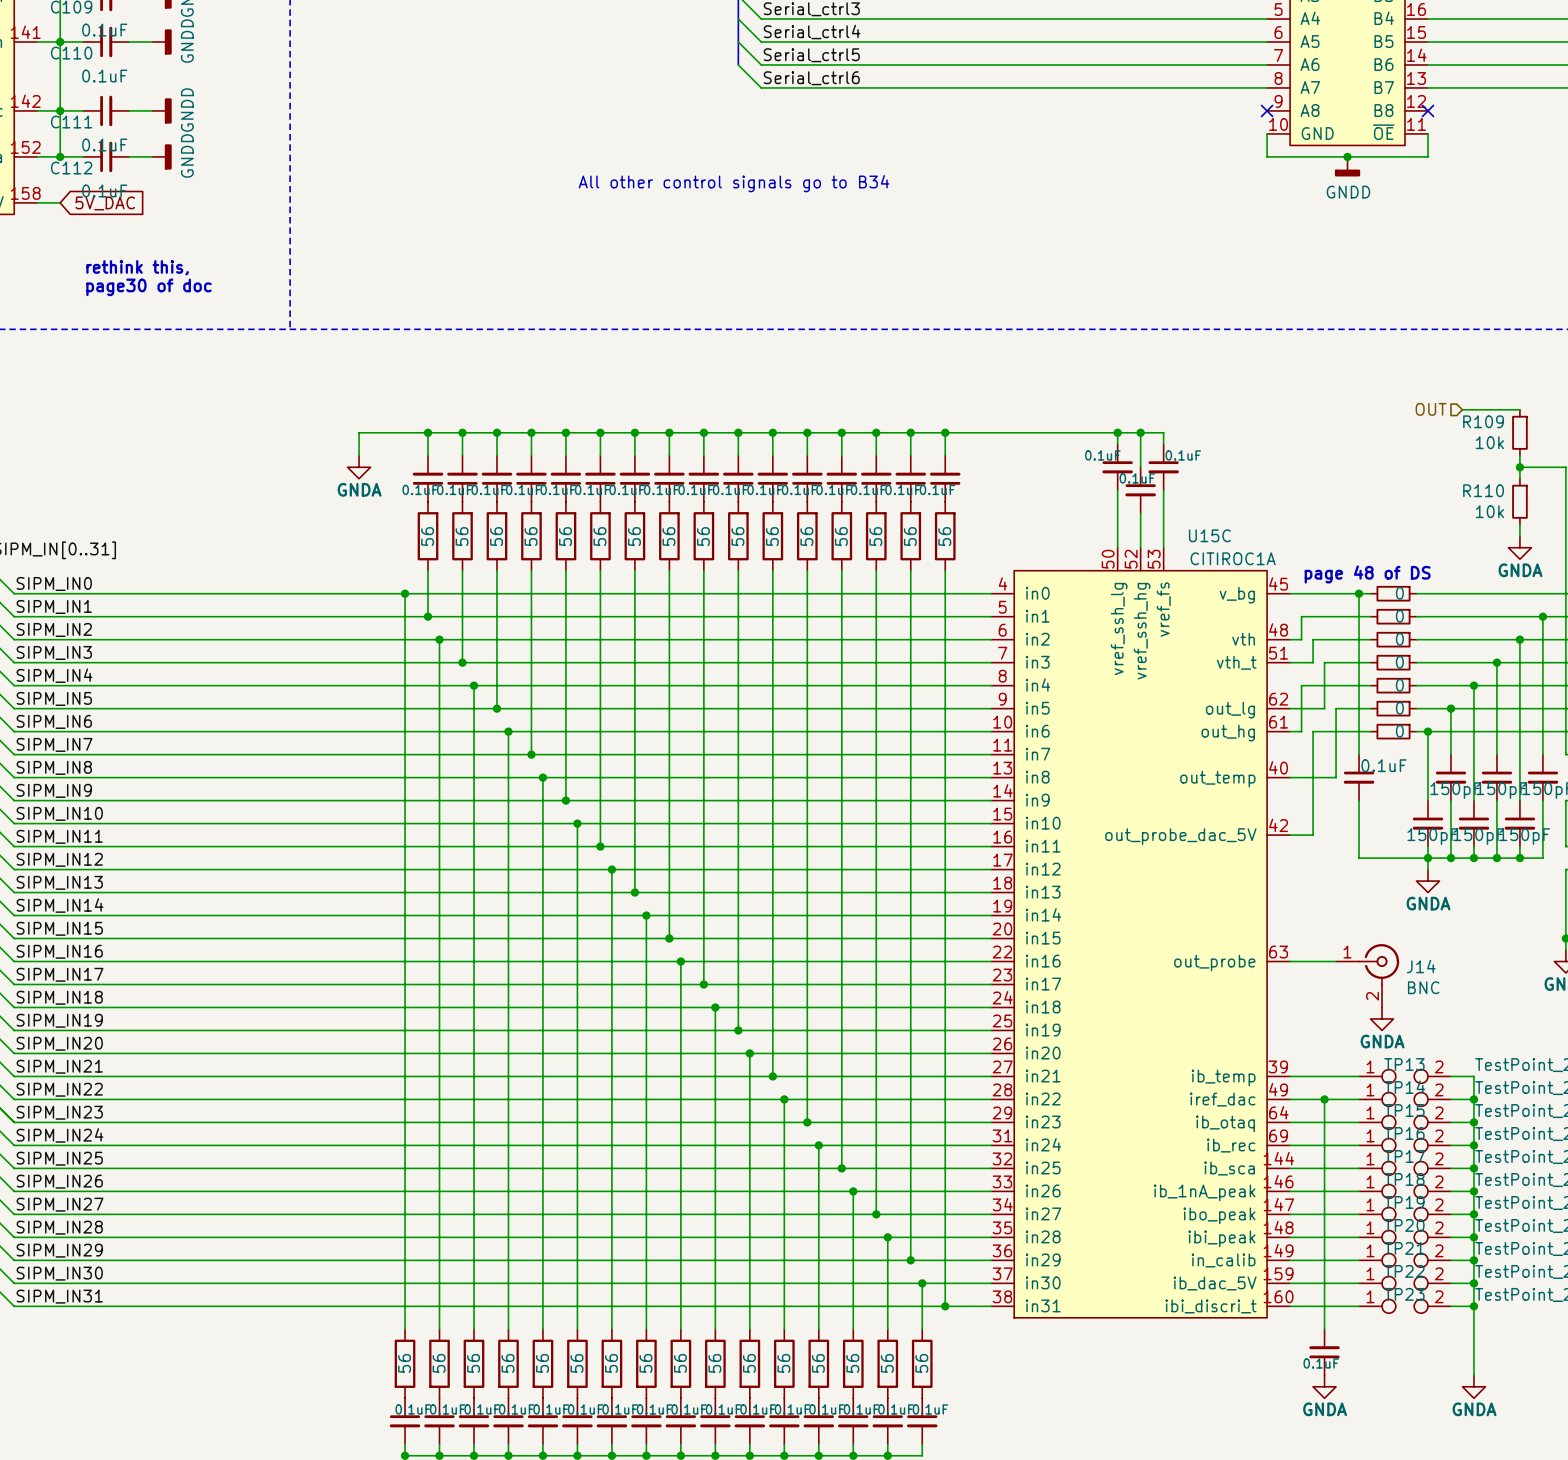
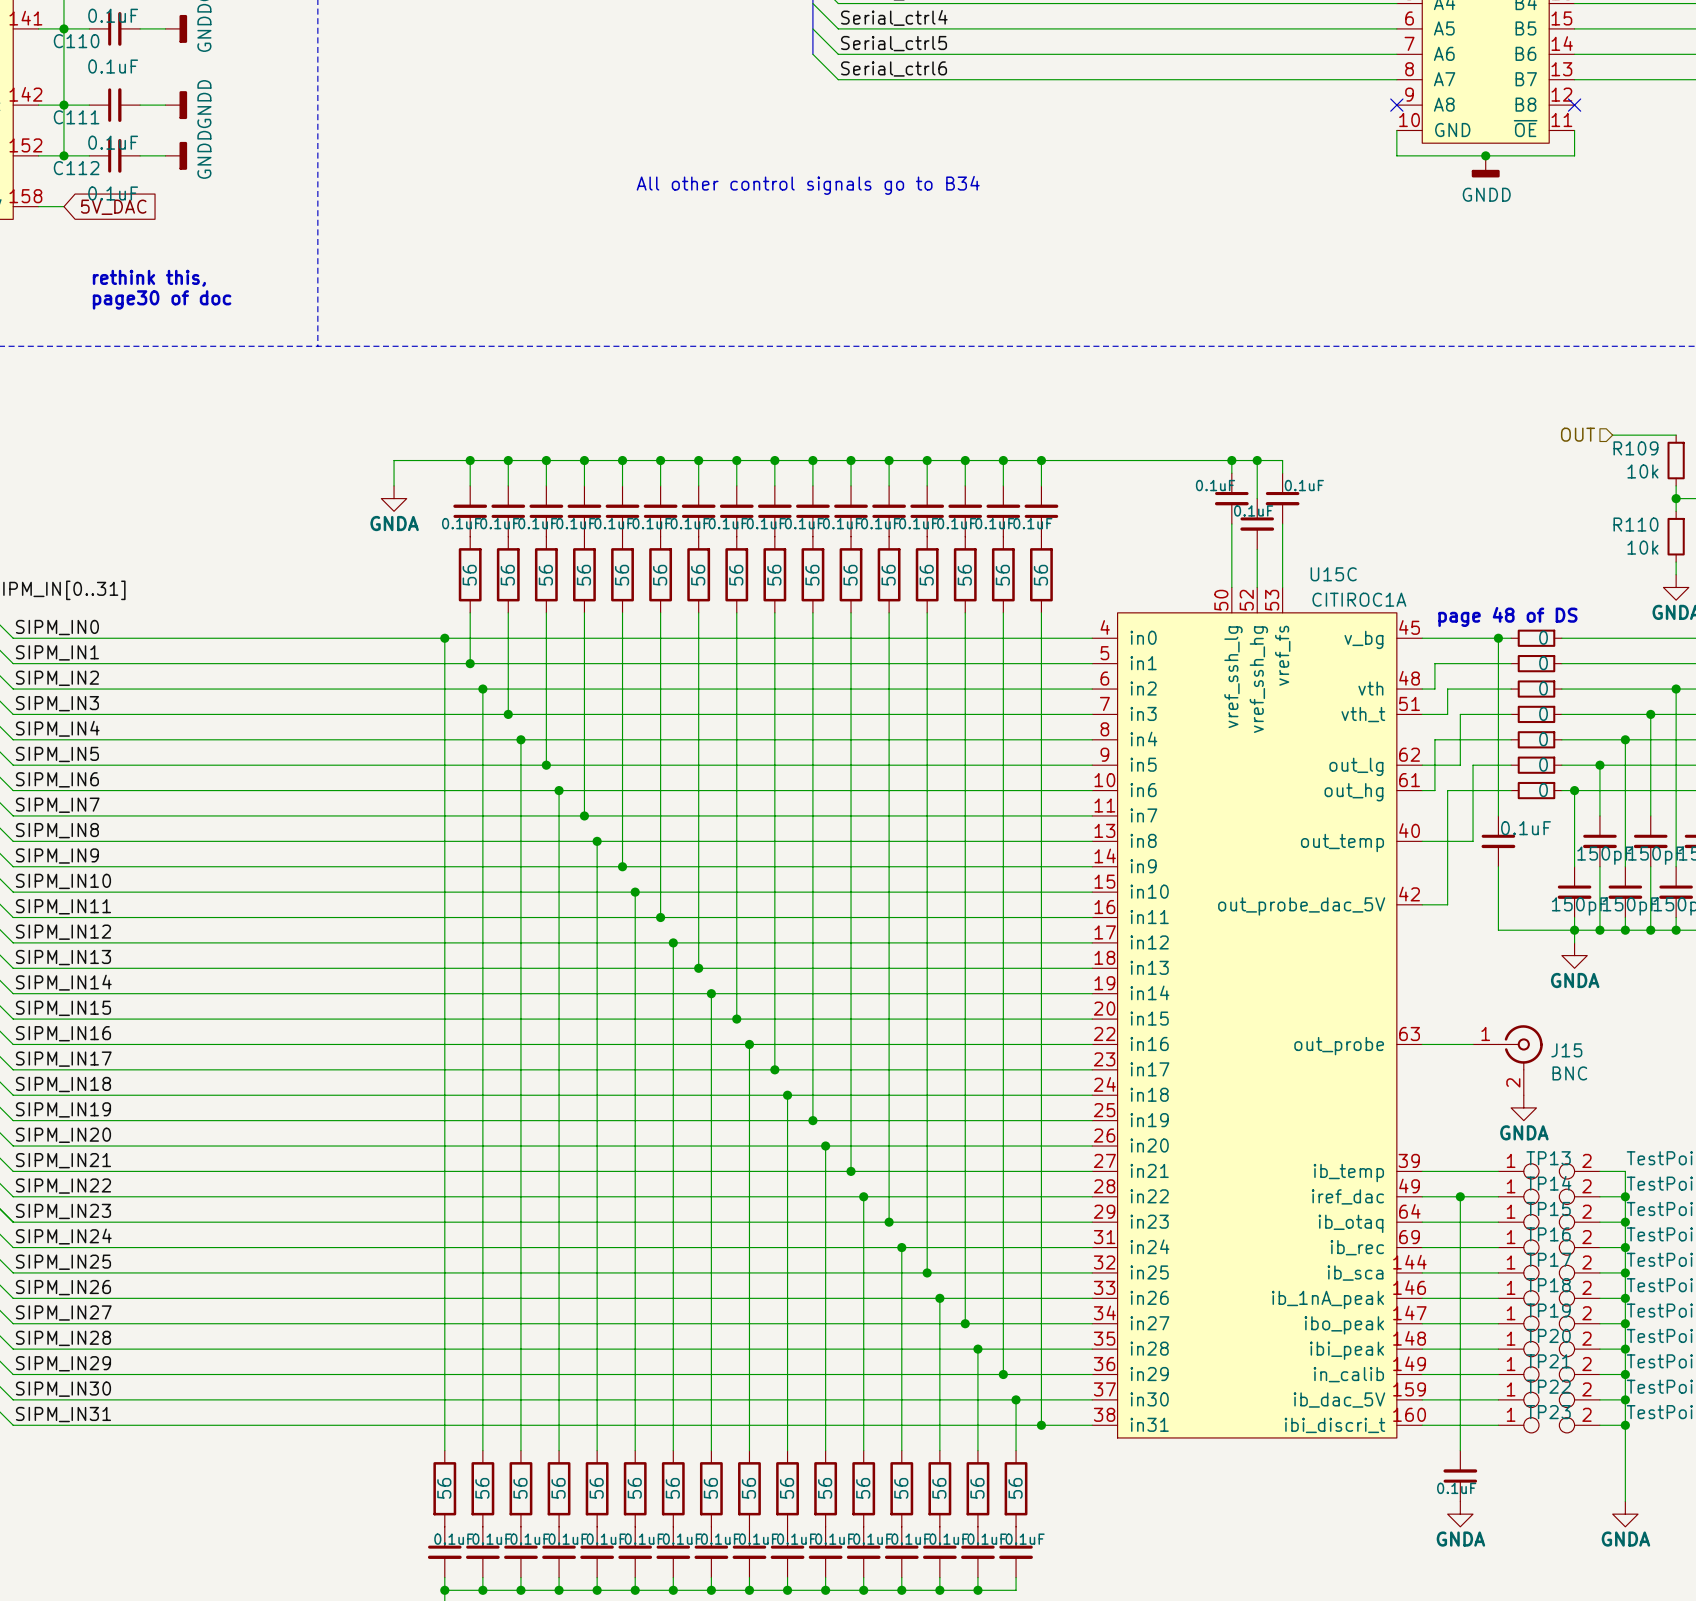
J14 name: J14 (1421, 966) -> J15 (1566, 1050)

